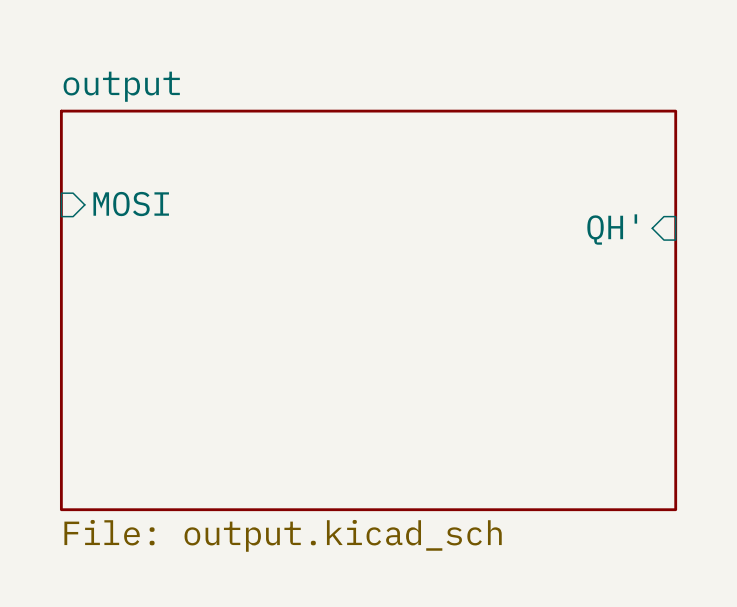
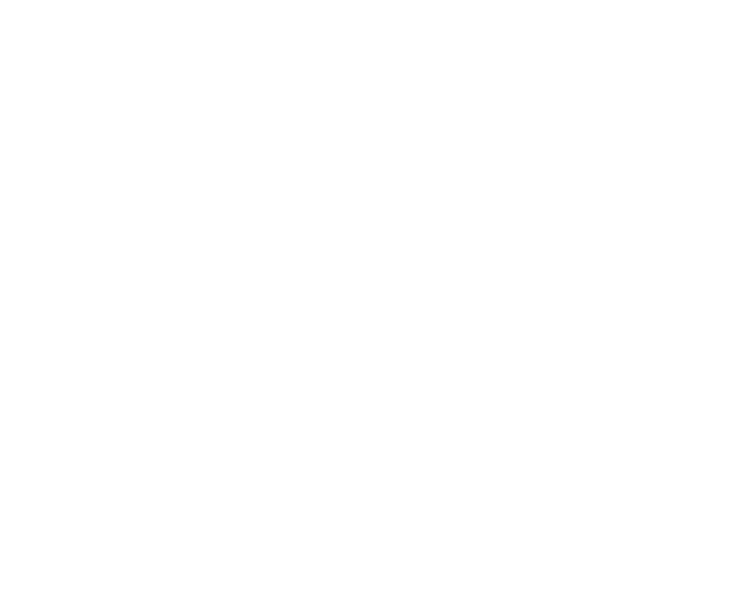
sheet pin: MOSI (131, 204) -> none
sheet pin: QH' (612, 229) -> none
sheet output: File: output.kicad_sch (368, 310) -> none

